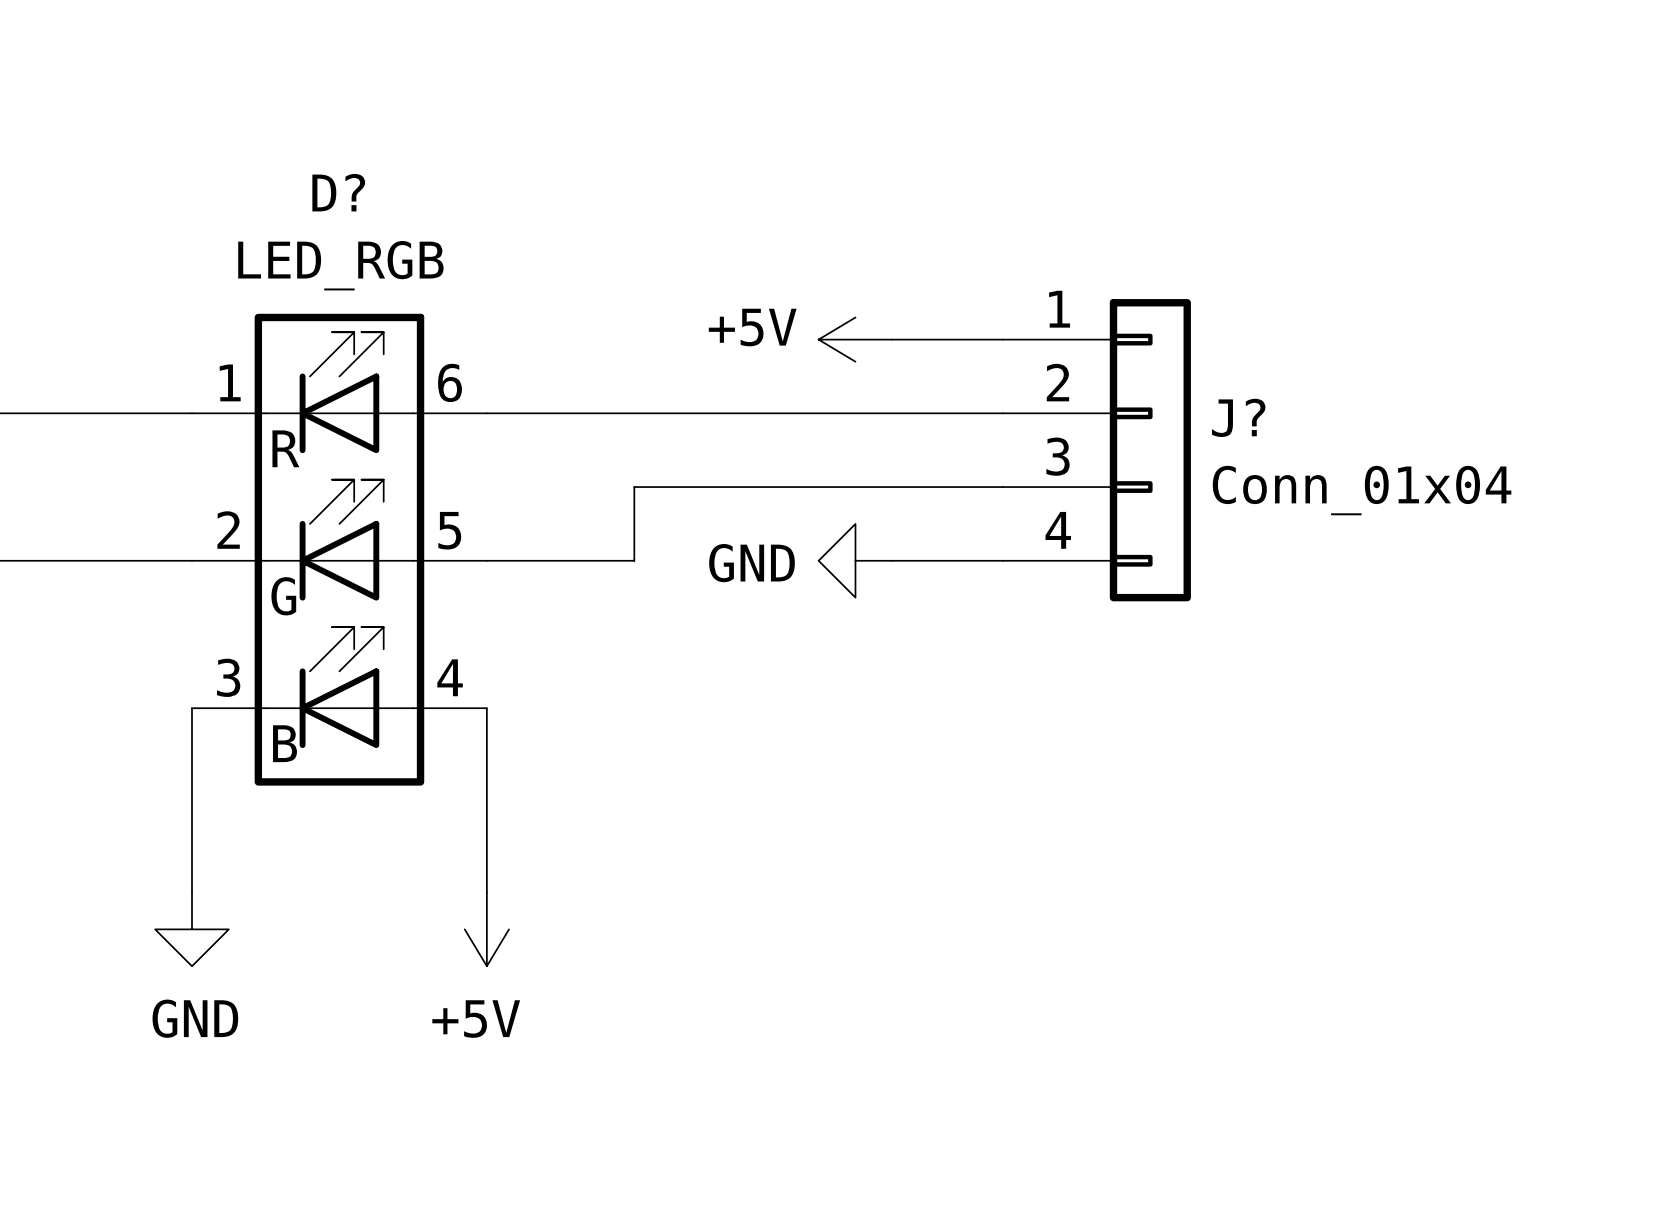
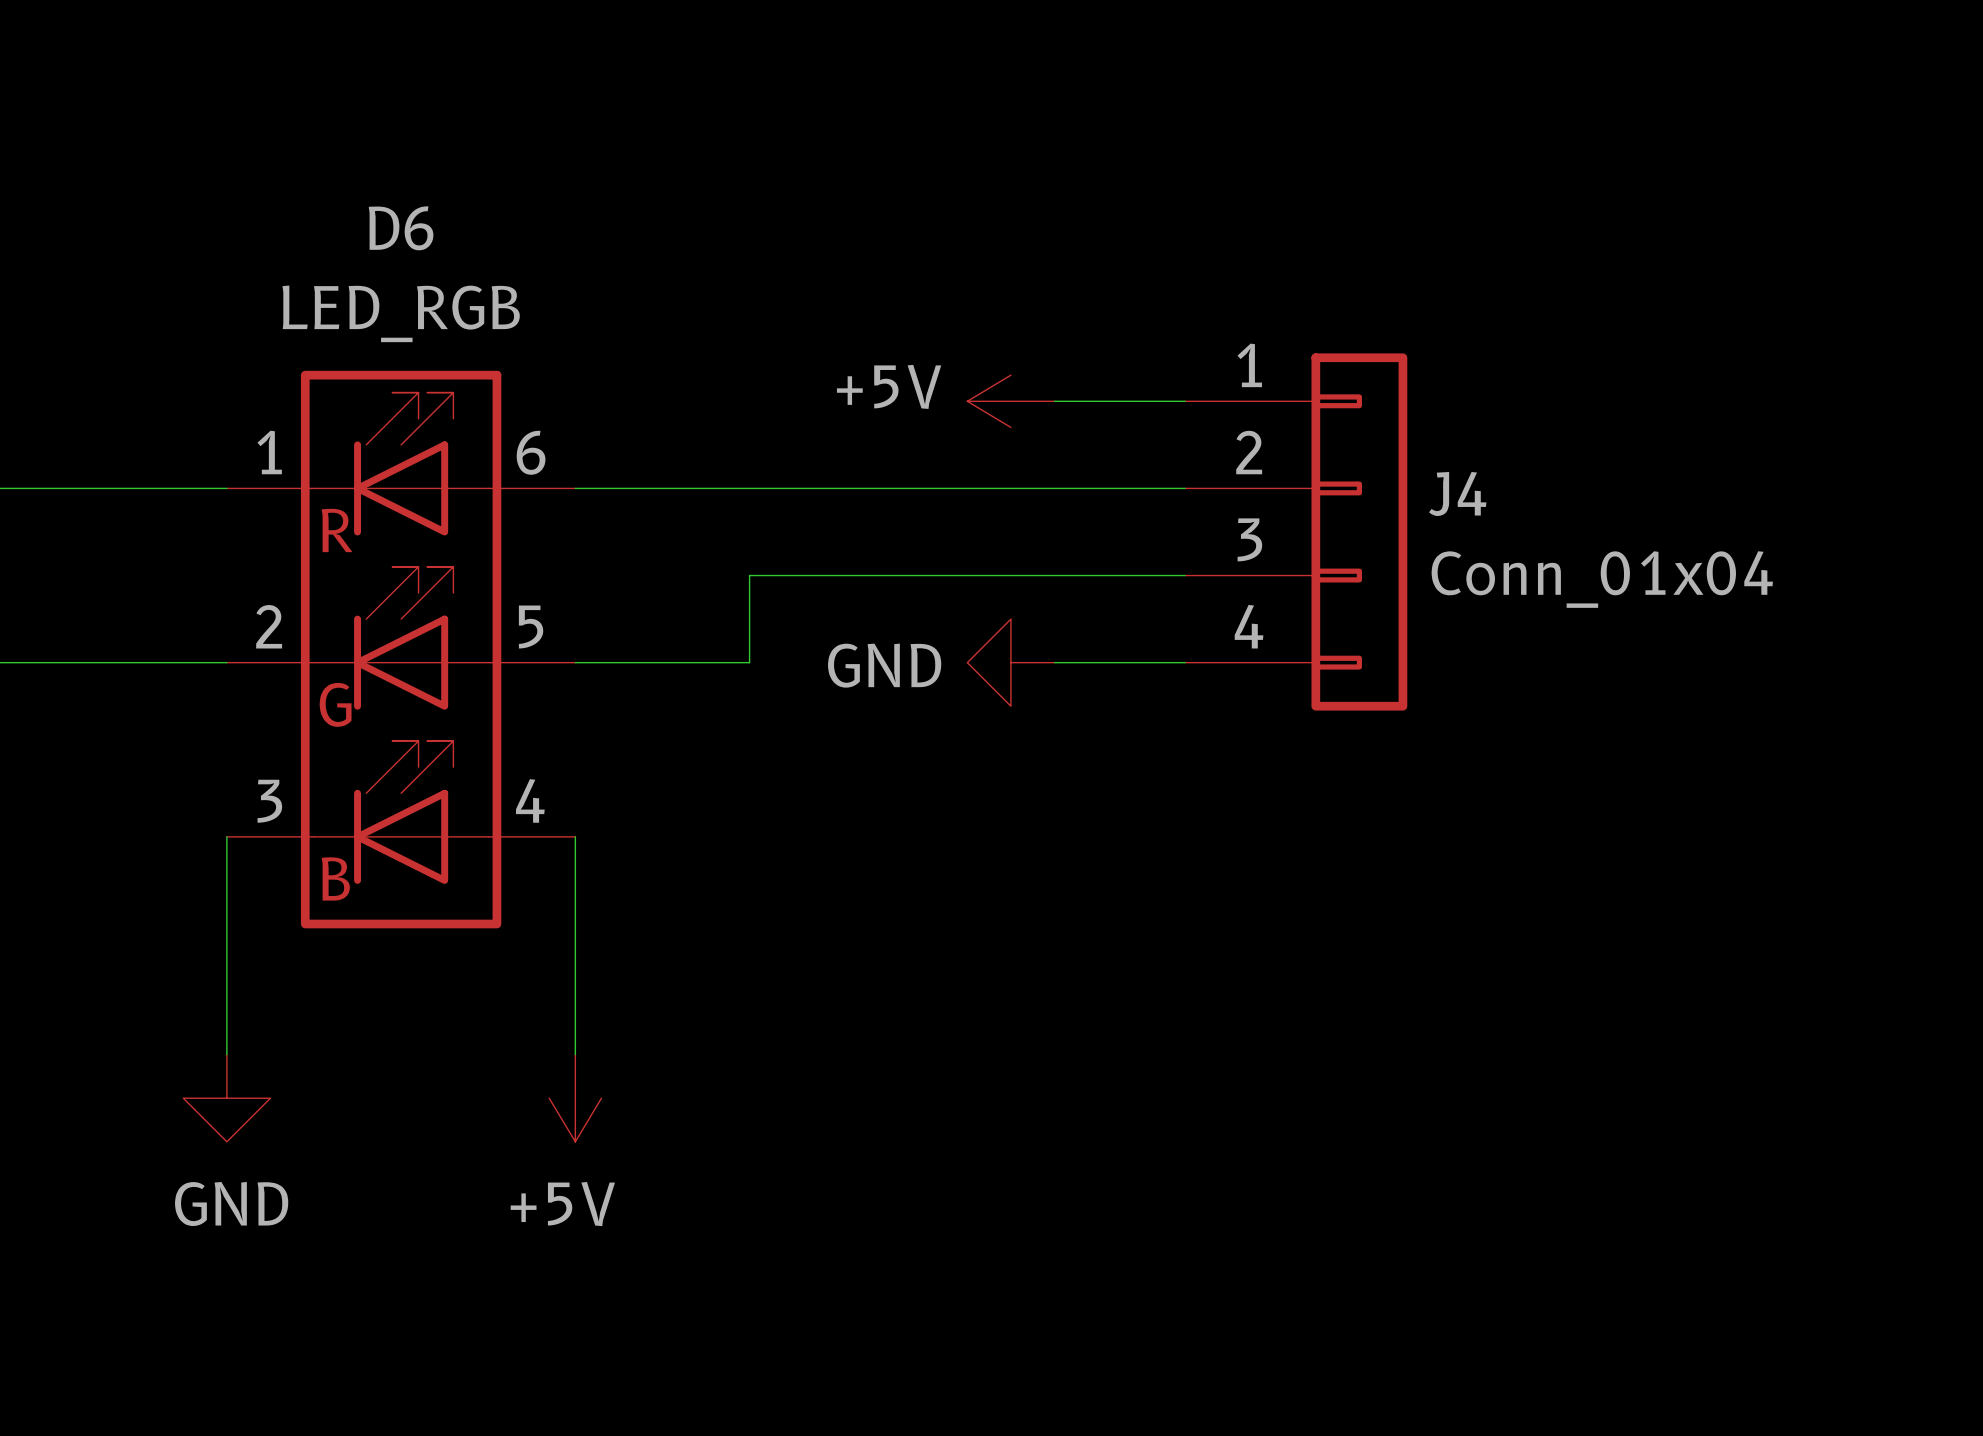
D? name: D? (338, 192) -> D6 (401, 228)
J? name: J? (1238, 417) -> J4 (1457, 494)

